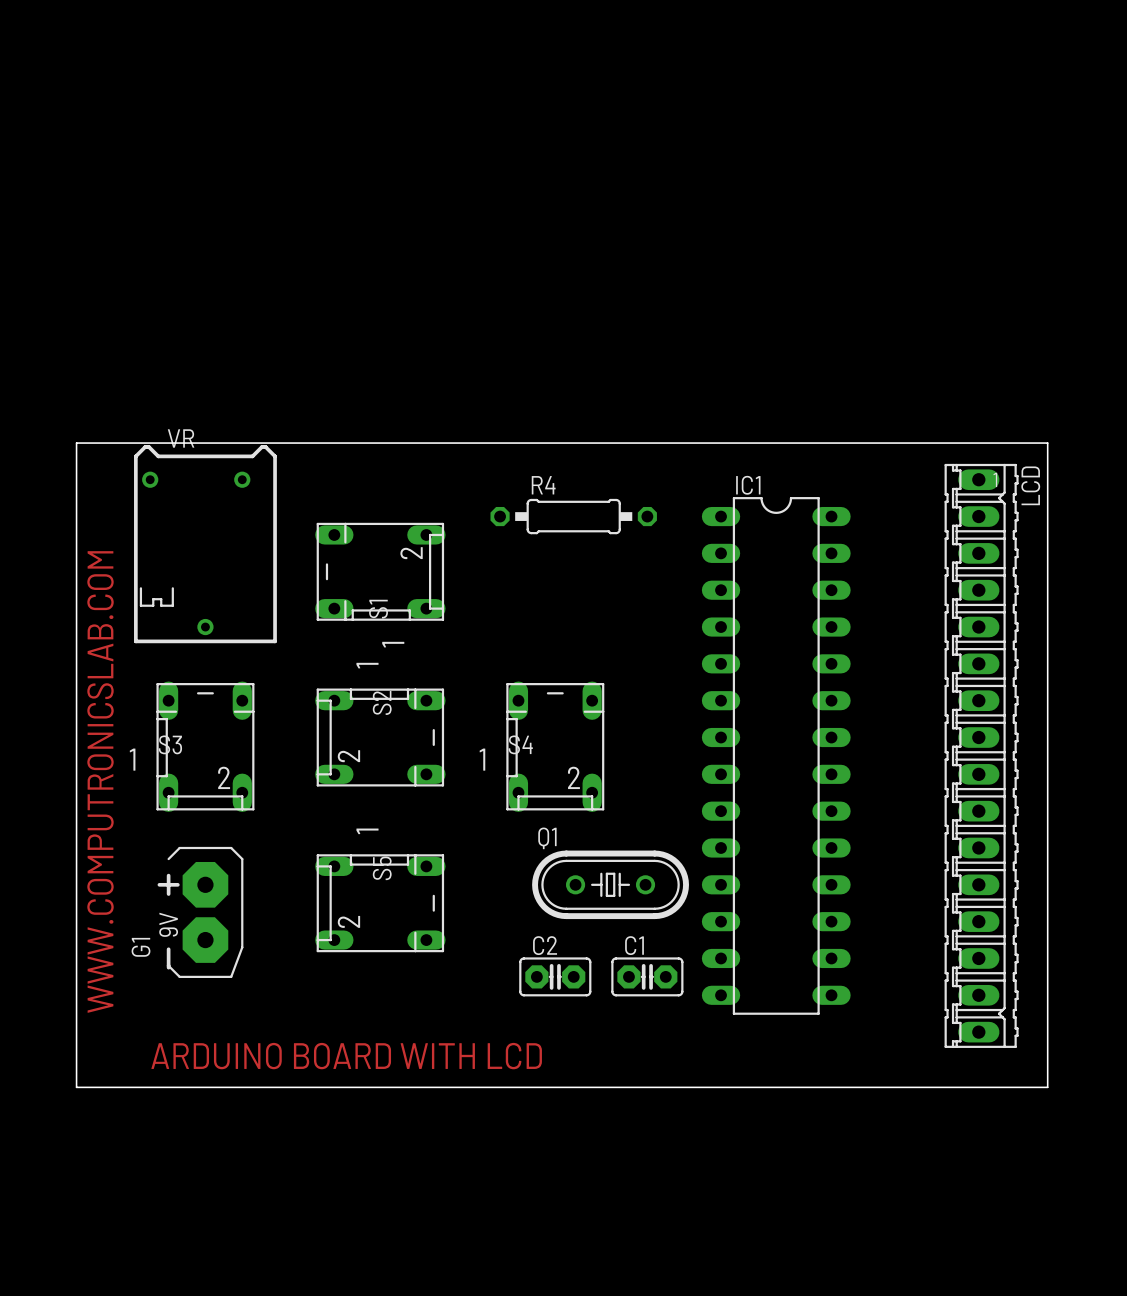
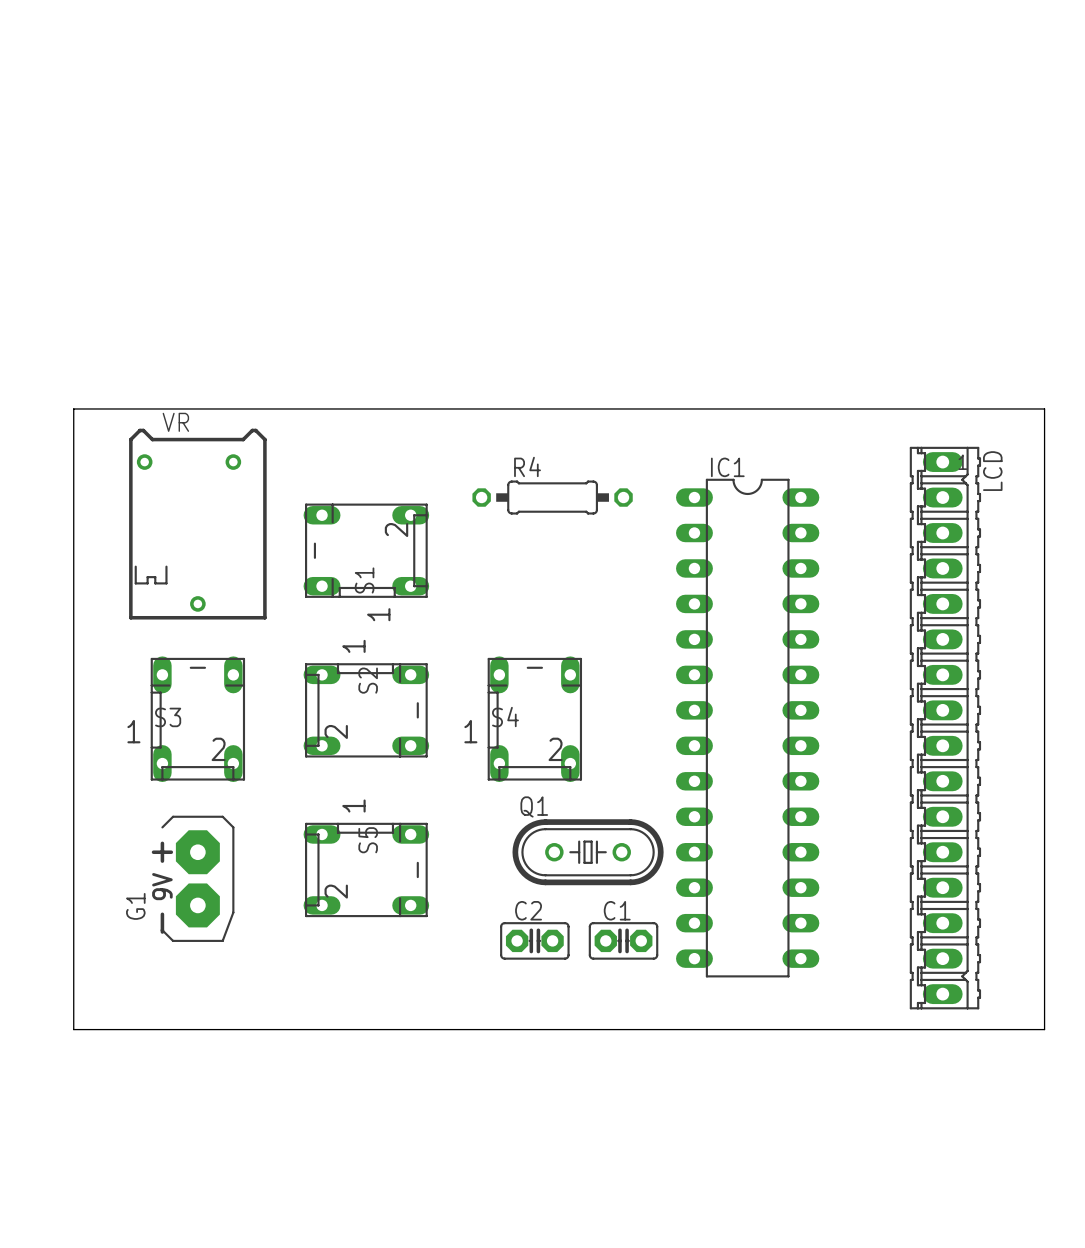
board edge: (76, 443) (1047, 443) (1047, 1087) (76, 1087) (76, 1068) -> (73, 426) (73, 408) (1044, 408) (1044, 1029) (73, 1029)
text: WWW.COMPUTRONICSLAB.COM (100, 781) -> none
text: ARDUINO BOARD WITH LCD (346, 1056) -> none

